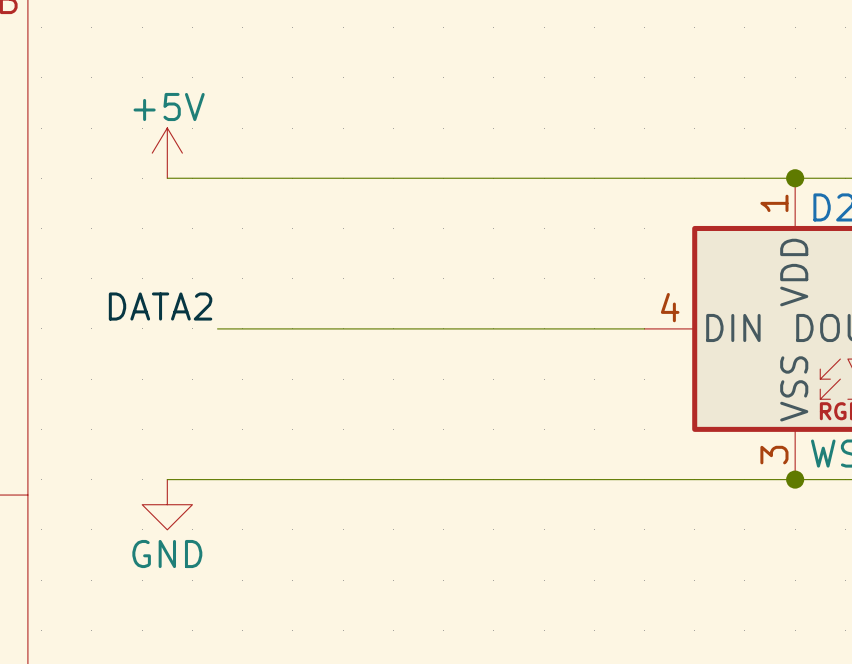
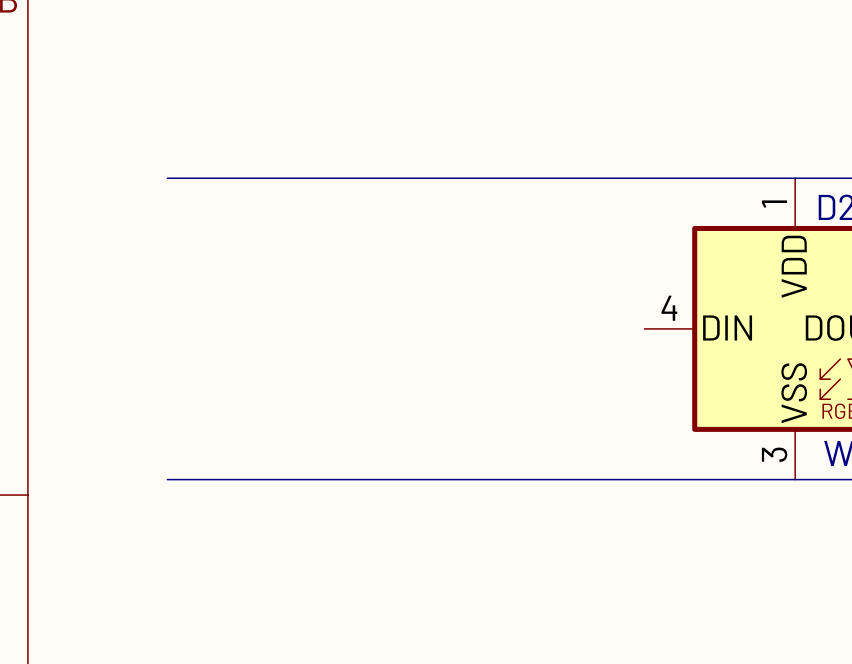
power symbol: +5V (167, 153) -> none
junction: (795, 178) -> none
label: DATA2 (160, 306) -> none
wire: (217, 328) (644, 328) -> none
junction: (795, 479) -> none
power symbol: GND (167, 504) -> none

